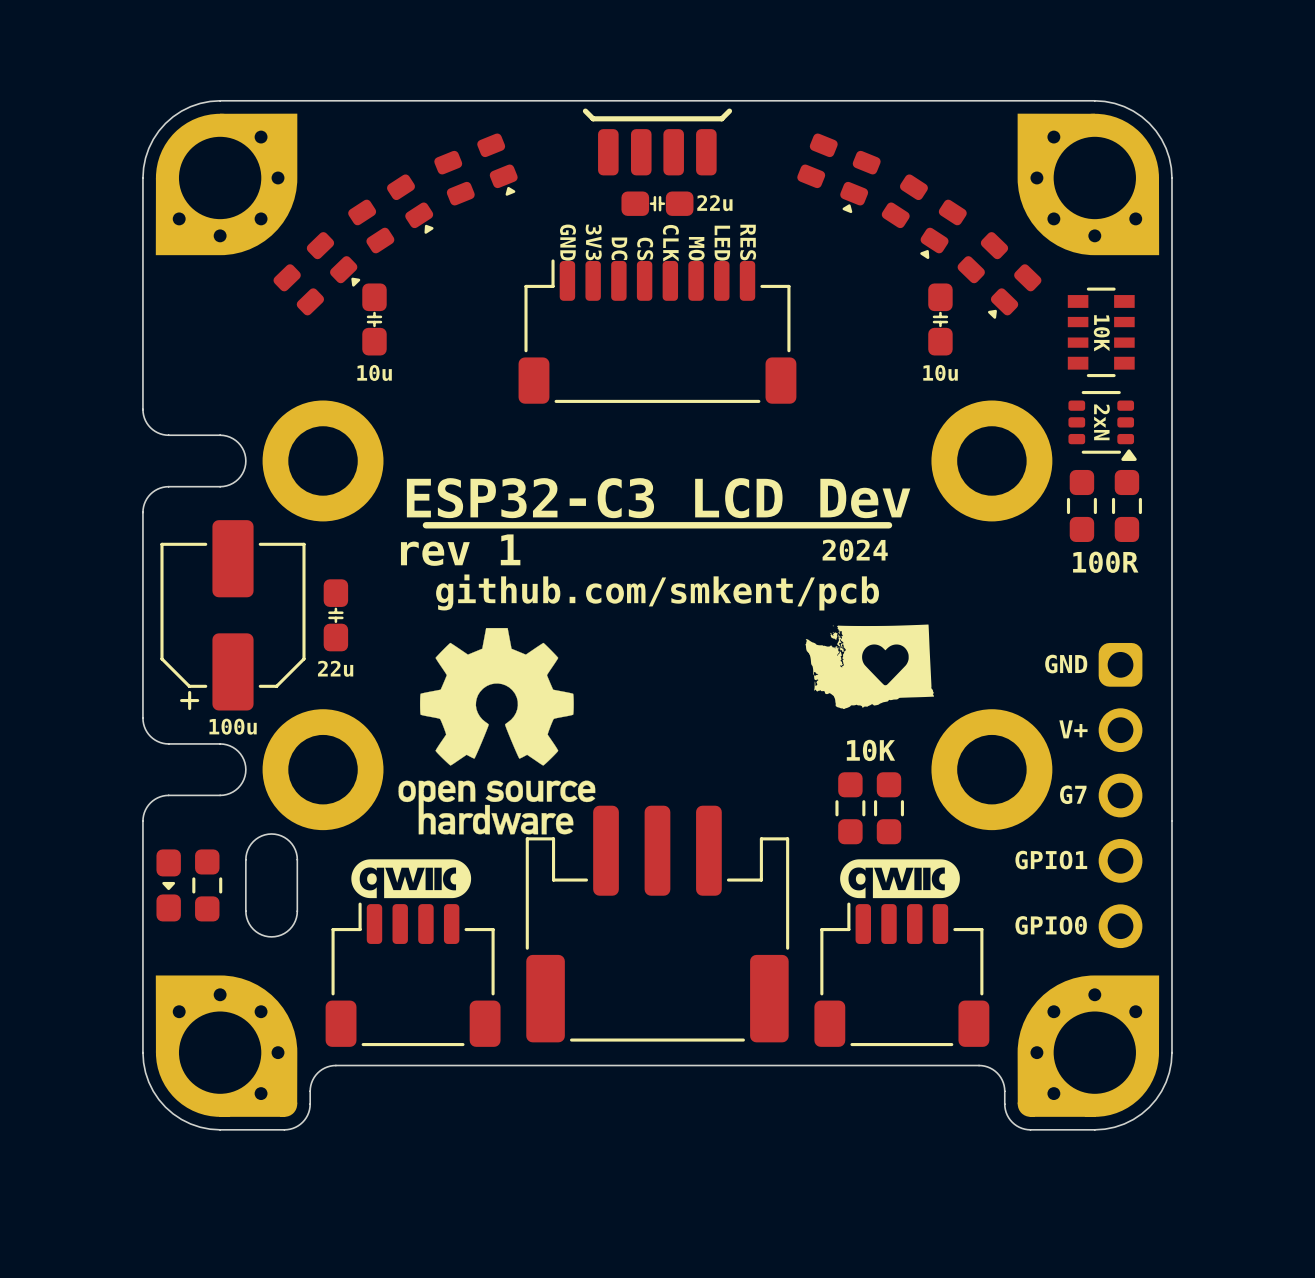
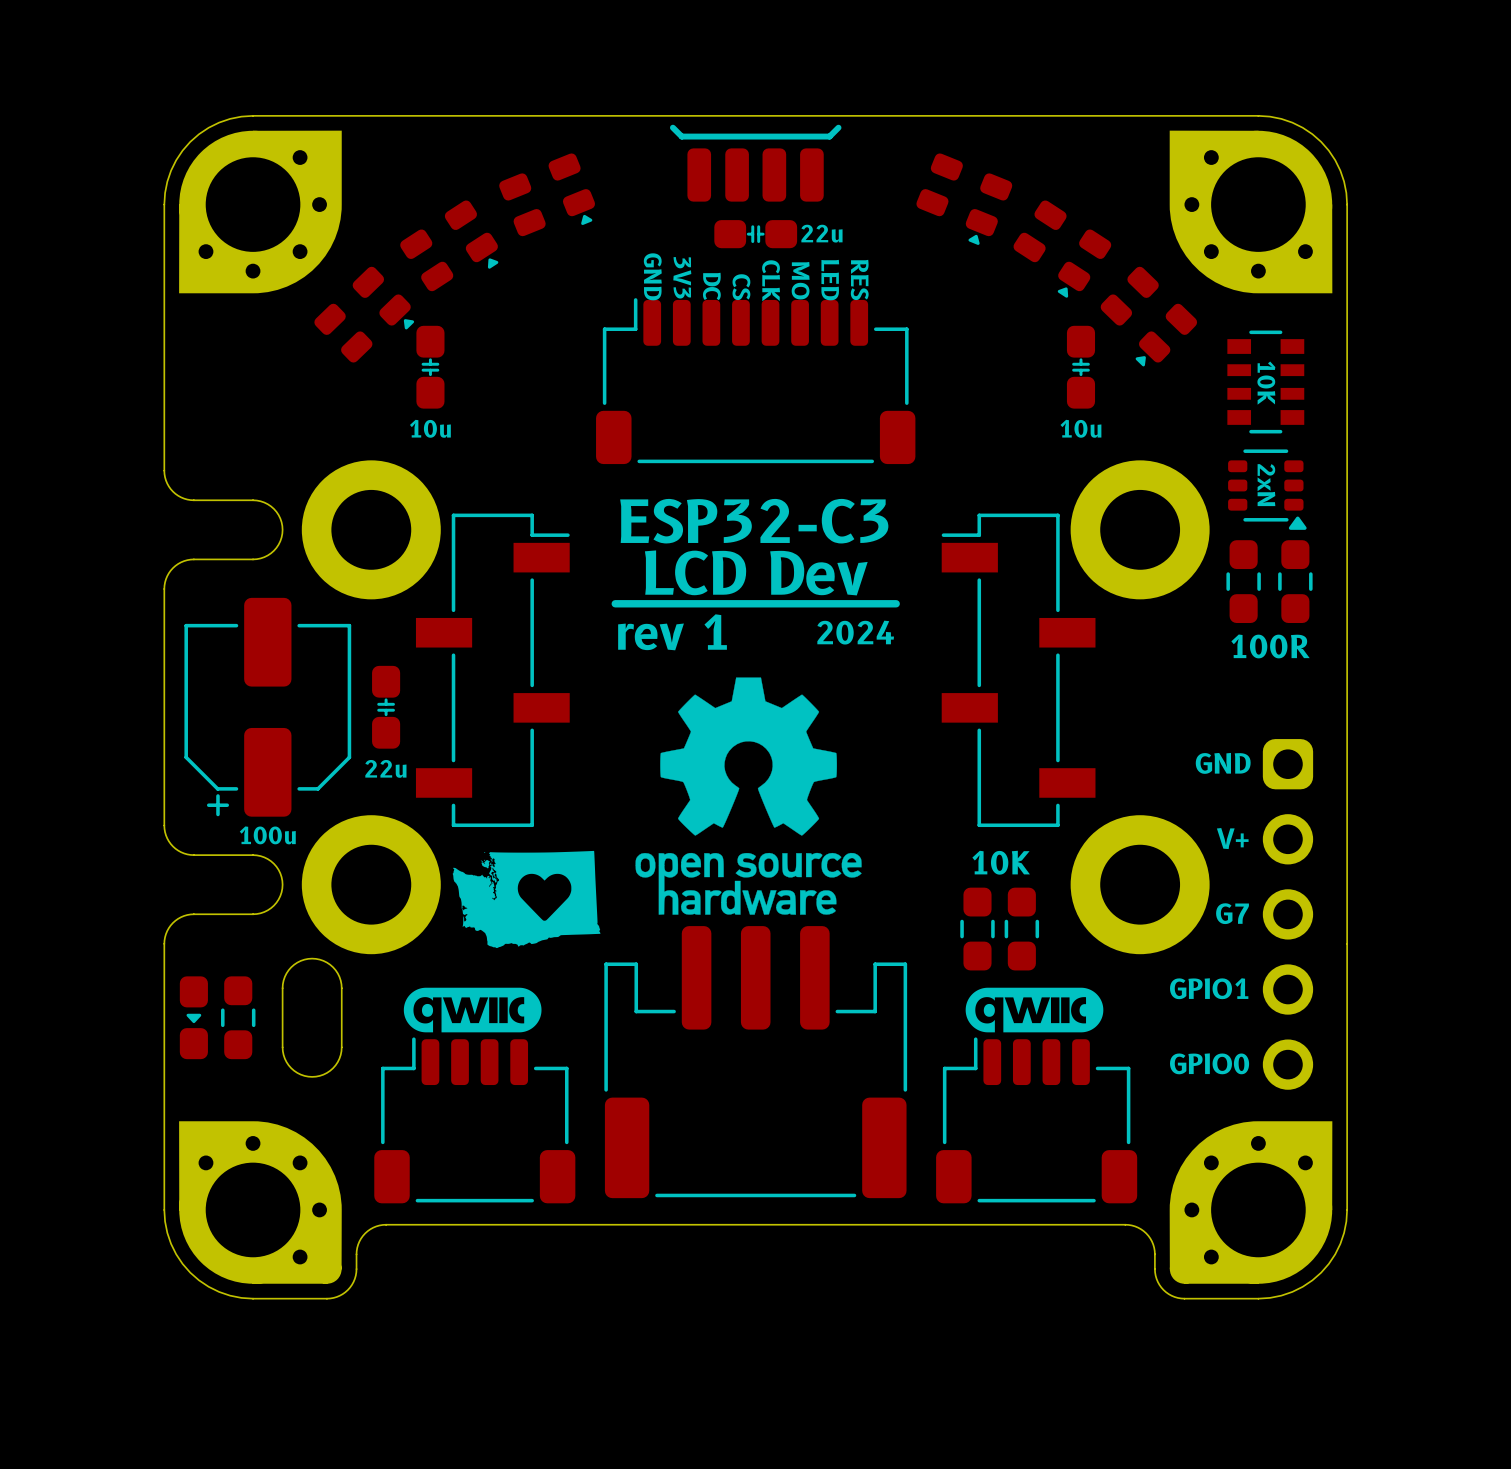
text: none -> ESP32-C3 (754, 521)
text: ESP32-C3 LCD Dev (658, 498) -> LCD Dev (756, 572)
line: (425, 525) (535, 525) -> none
line: (779, 525) (889, 525) -> none
text position: rev 1 (460, 550) -> rev 1 (672, 632)
text position: 2024 (855, 550) -> 2024 (855, 632)
part: none -> (492, 670)
part: none -> (1018, 670)
text: github.com/smkent/pcb (657, 592) -> none
drawing position: (869, 666) -> (526, 899)
drawing position: (496, 731) -> (748, 796)

